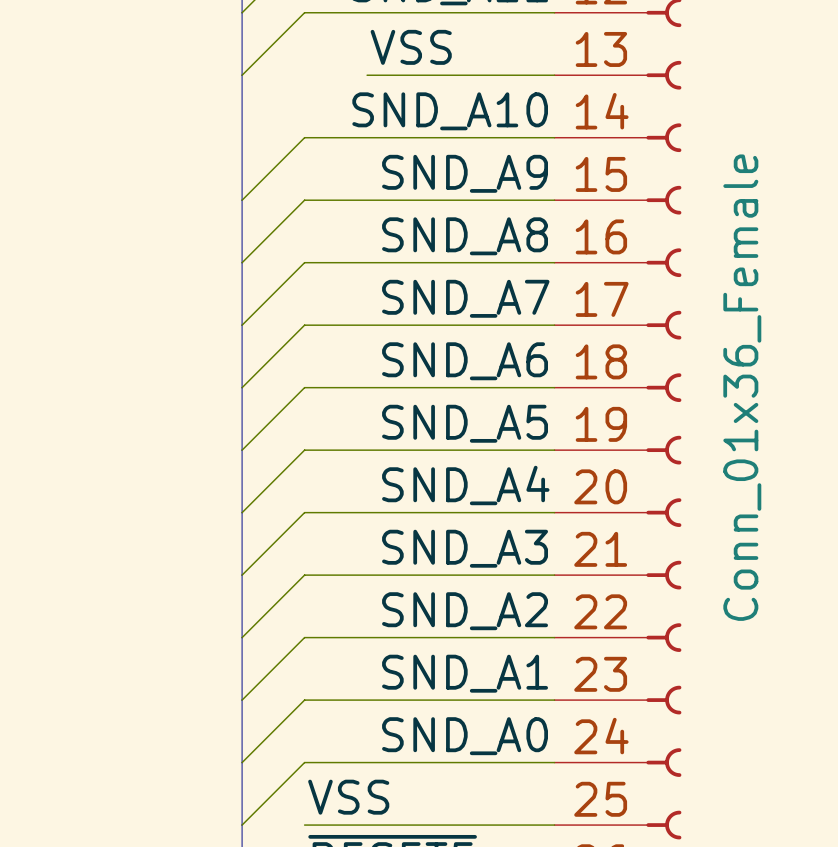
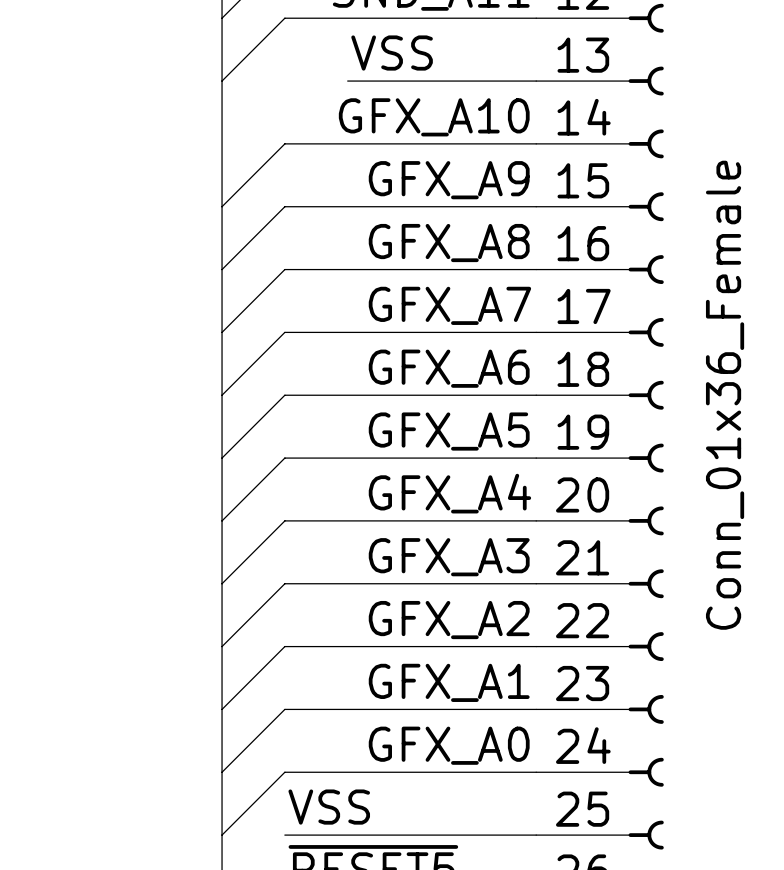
label: SND_A10 (450, 111) -> GFX_A10 (434, 117)
label: SND_A9 (465, 173) -> GFX_A9 (449, 180)
label: SND_A8 (465, 236) -> GFX_A8 (449, 243)
label: SND_A7 (465, 298) -> GFX_A7 (449, 305)
label: SND_A6 (465, 361) -> GFX_A6 (449, 368)
label: SND_A5 (465, 423) -> GFX_A5 (449, 431)
label: SND_A4 (465, 485) -> GFX_A4 (449, 493)
label: SND_A3 (465, 548) -> GFX_A3 (449, 557)
label: SND_A2 (465, 611) -> GFX_A2 (449, 620)
label: SND_A1 (465, 673) -> GFX_A1 (449, 682)
label: SND_A0 (465, 736) -> GFX_A0 (449, 745)

